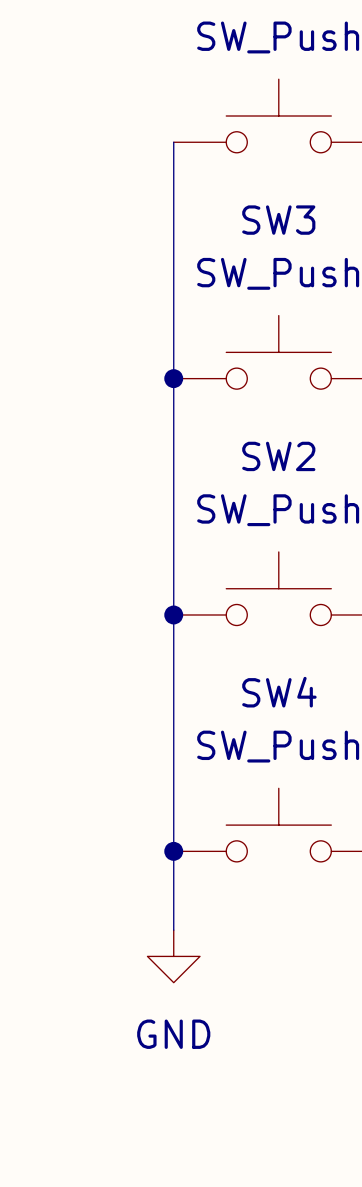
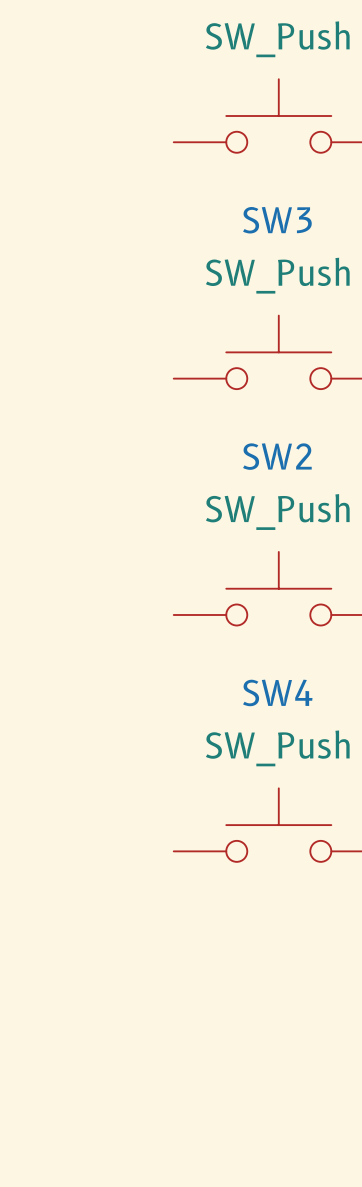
wire: (173, 142) (173, 930) -> none
junction: (173, 378) -> none
junction: (173, 614) -> none
junction: (173, 851) -> none
power symbol: GND (173, 956) -> none

